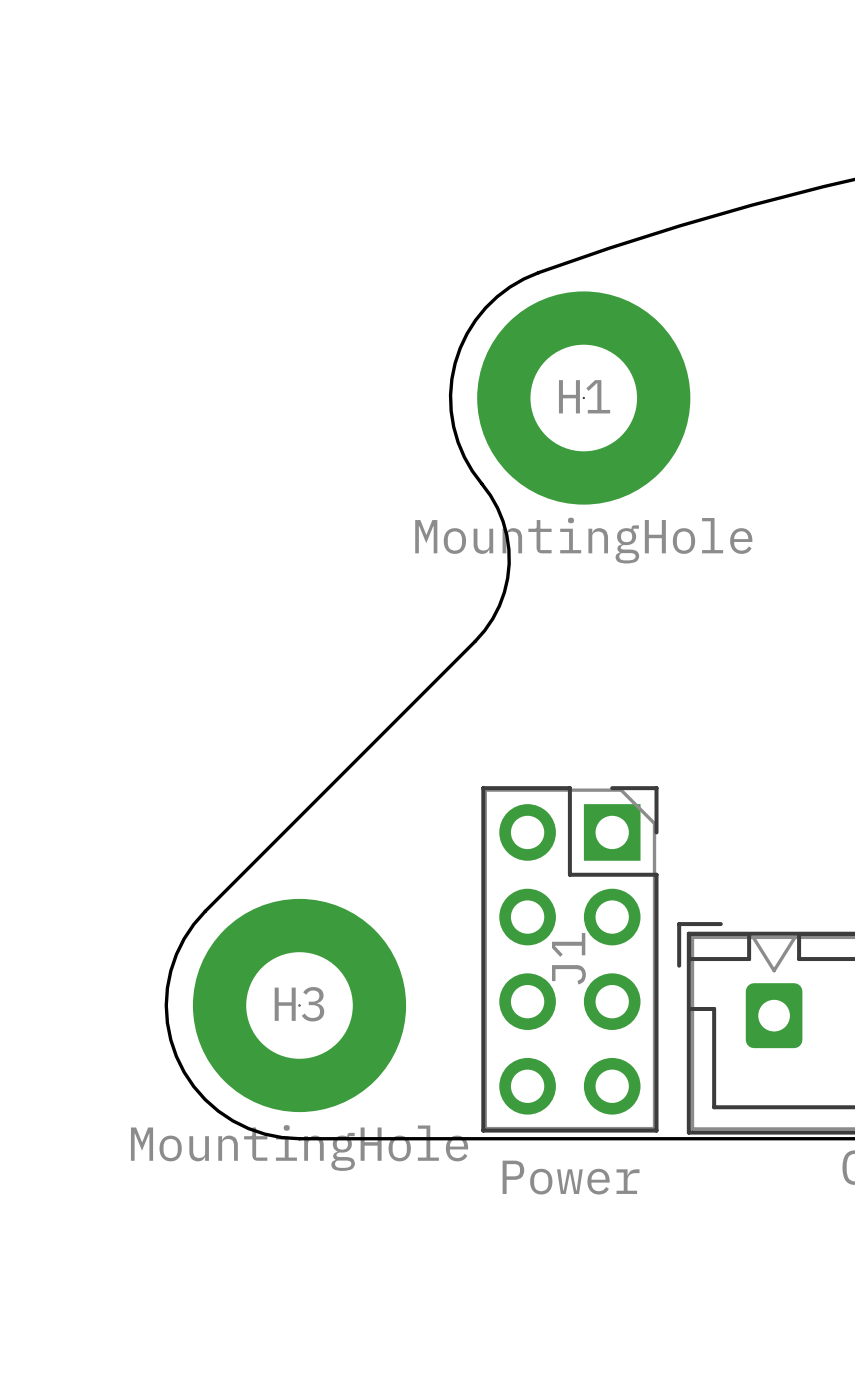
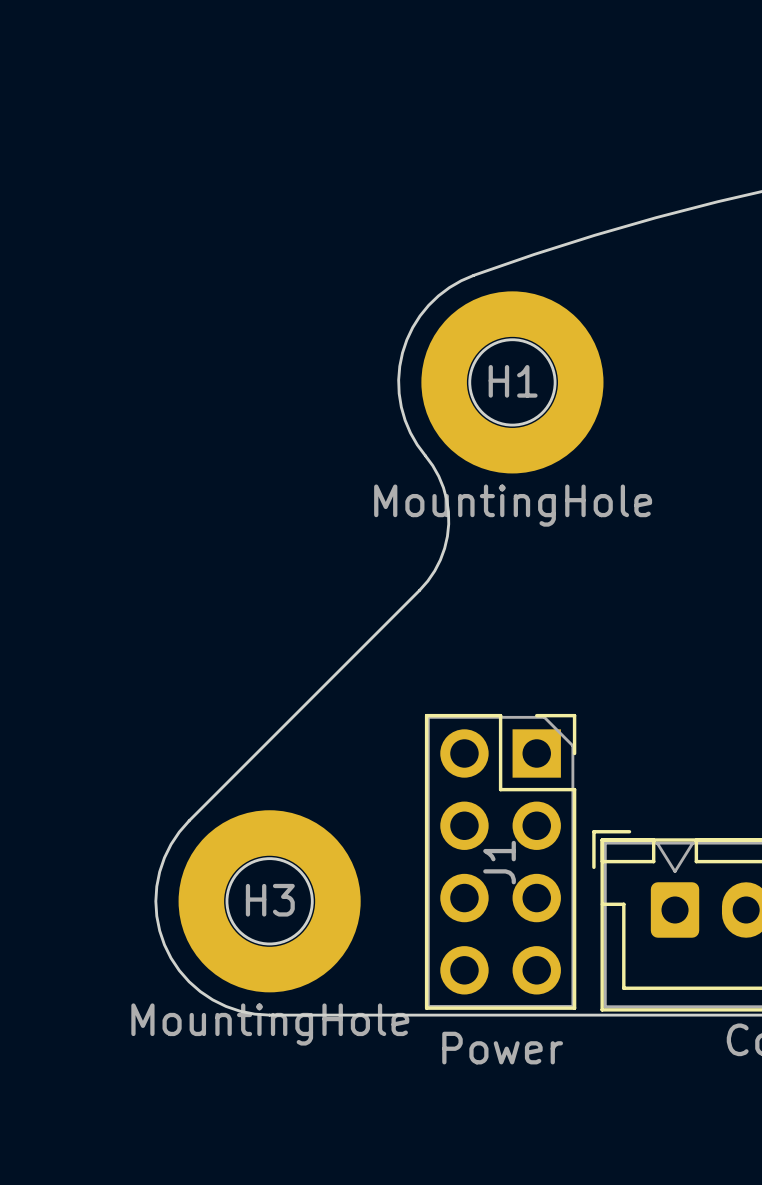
round board edge size: [583, 397, 585, 399] -> [468, 338, 557, 427]
round board edge size: [299, 1005, 300, 1006] -> [225, 857, 314, 946]

